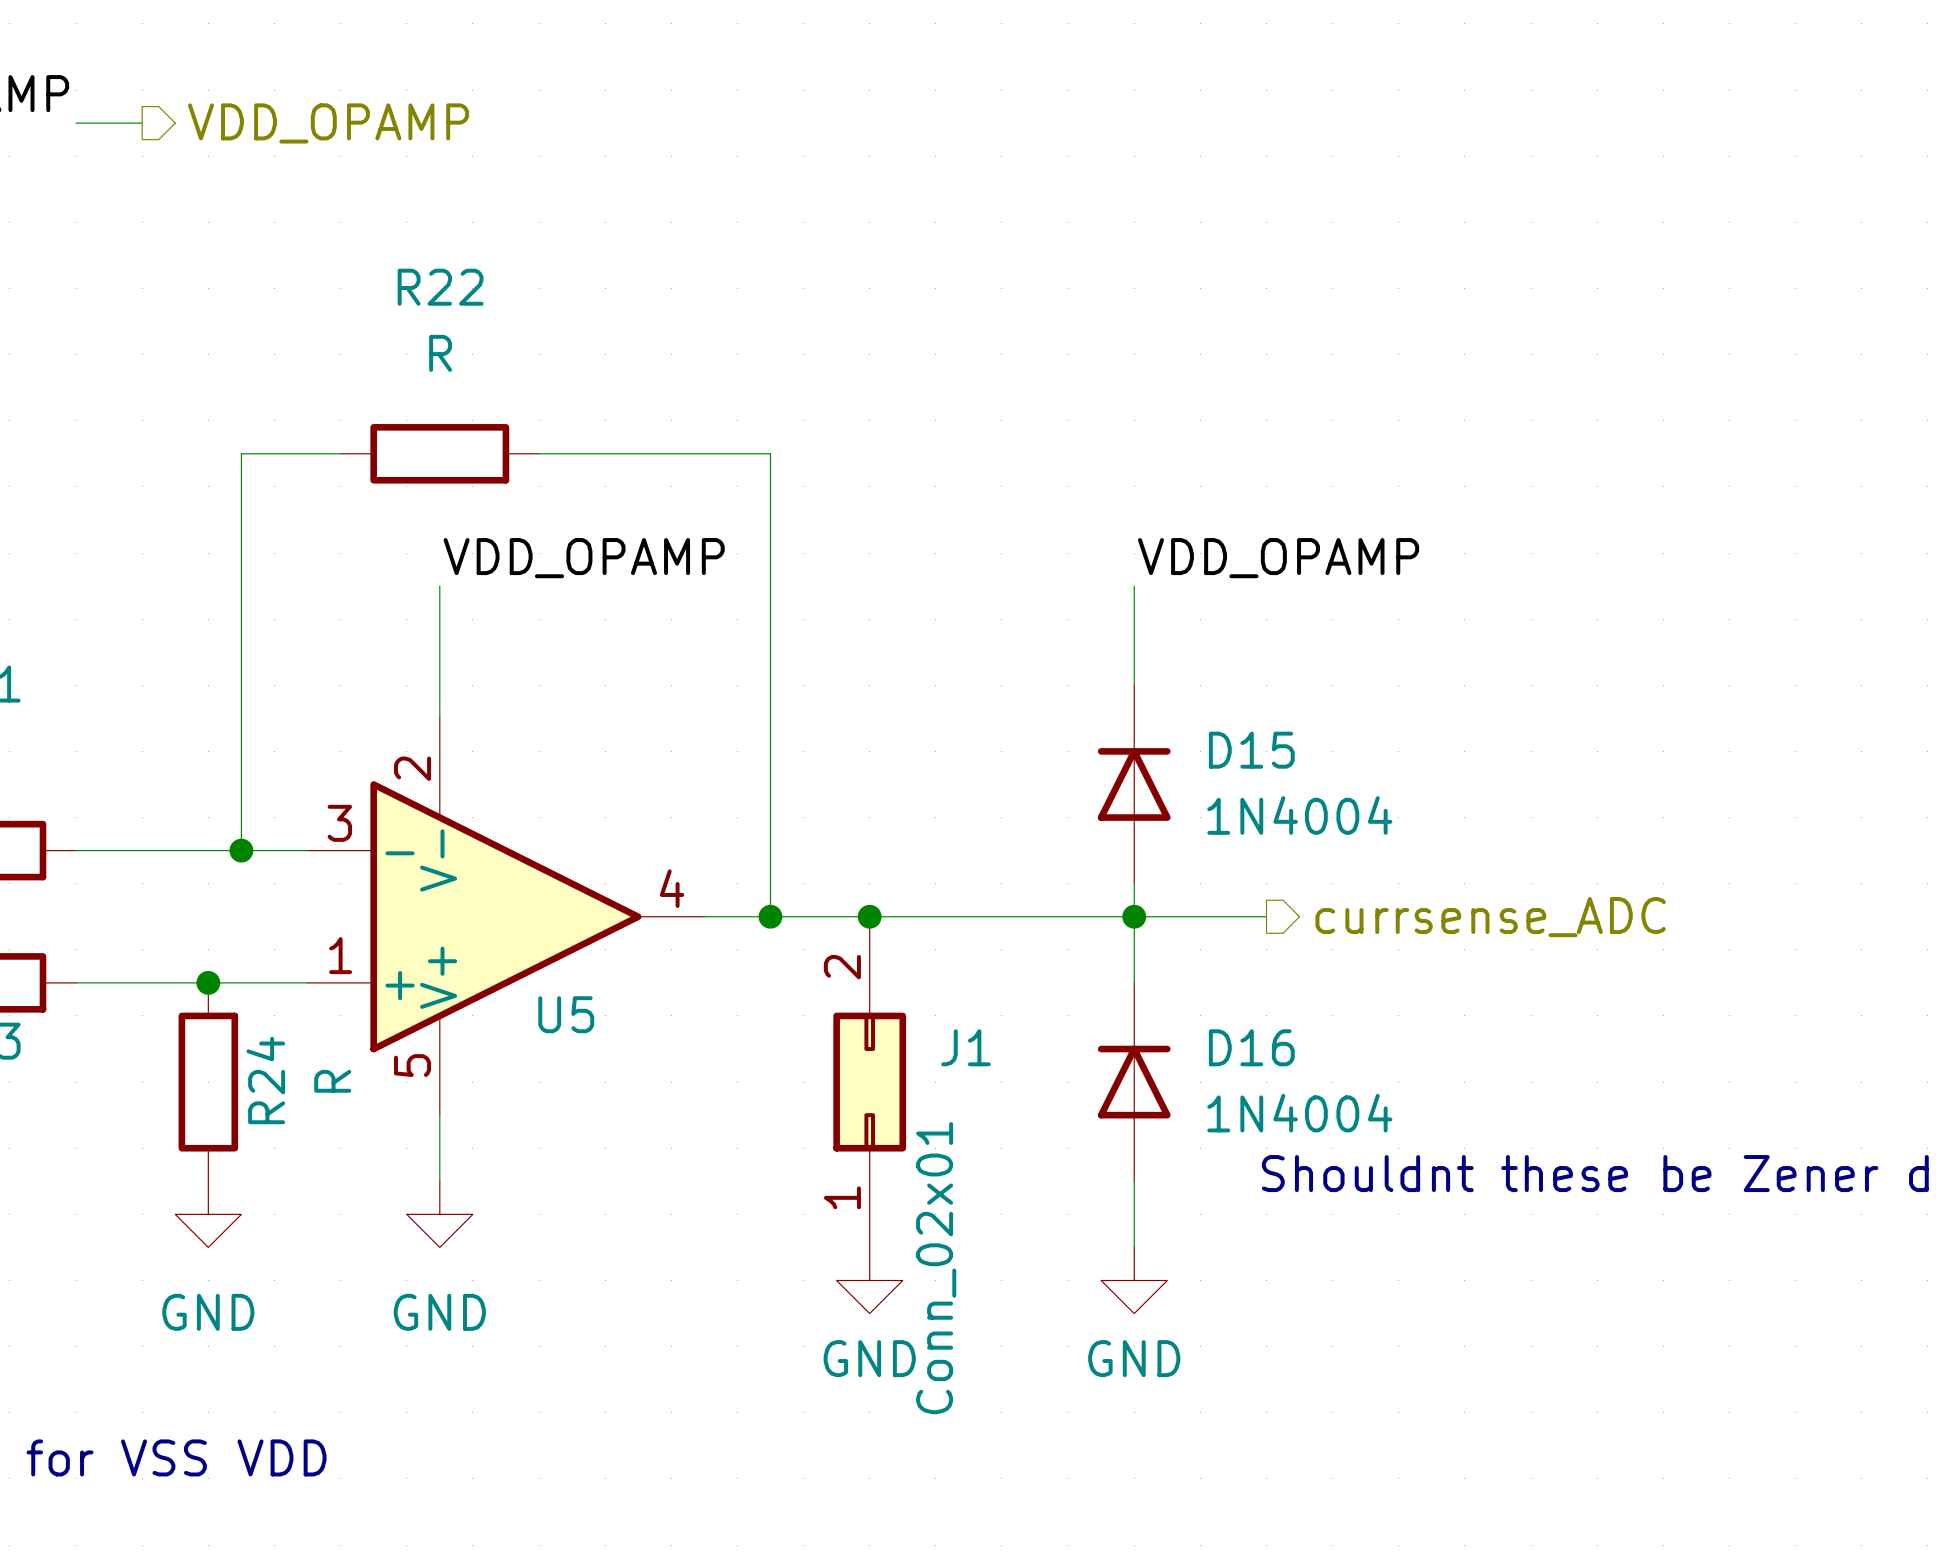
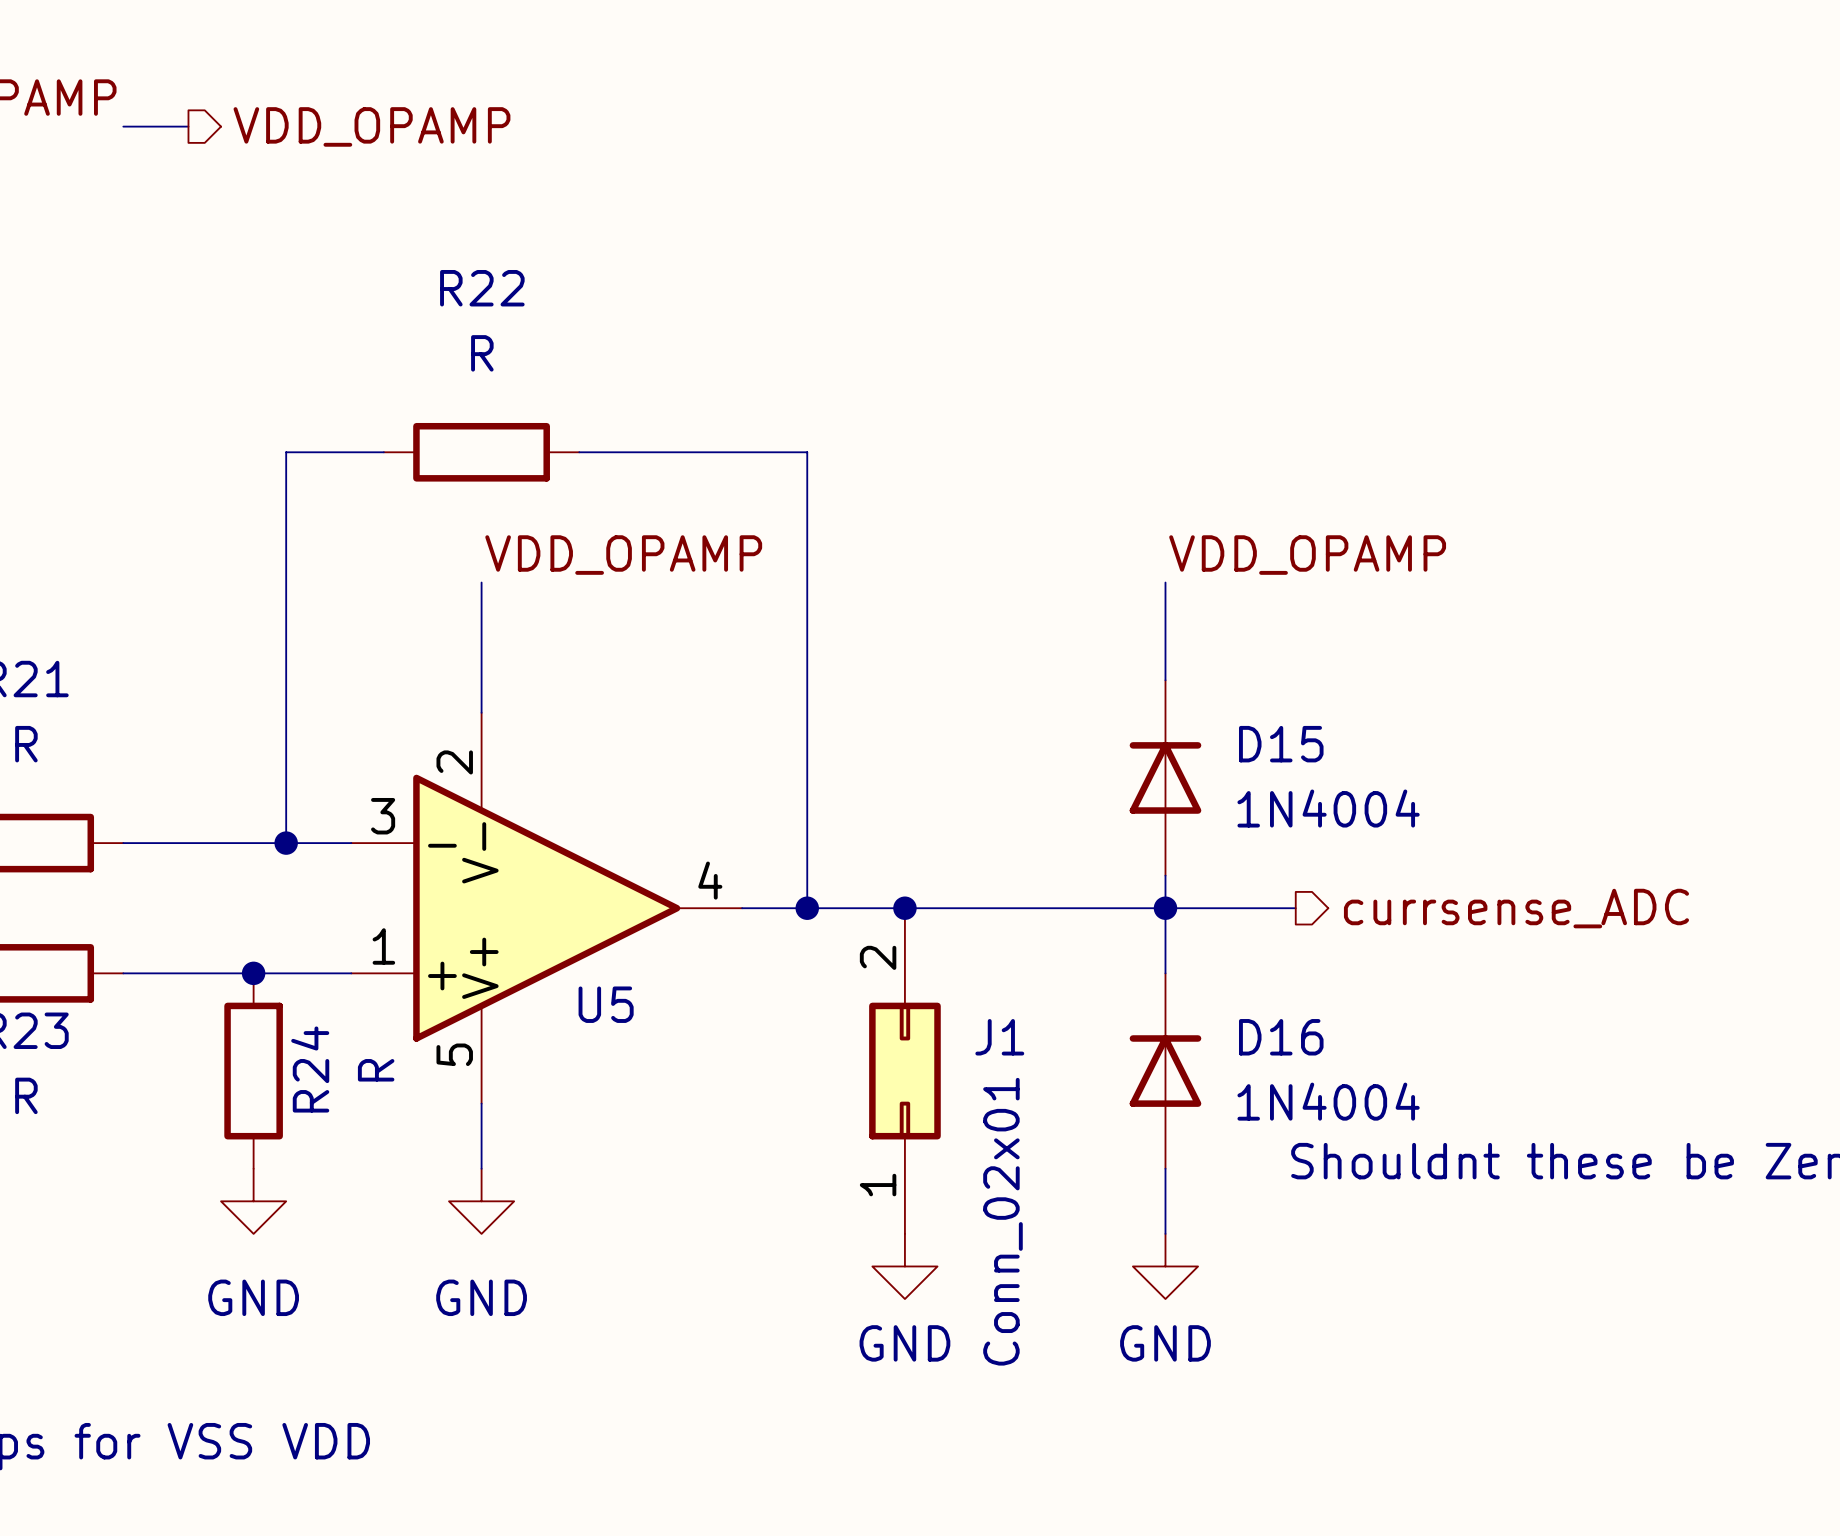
J1 value position: Conn_02x01 (936, 1268) -> Conn_02x01 (1002, 1221)

